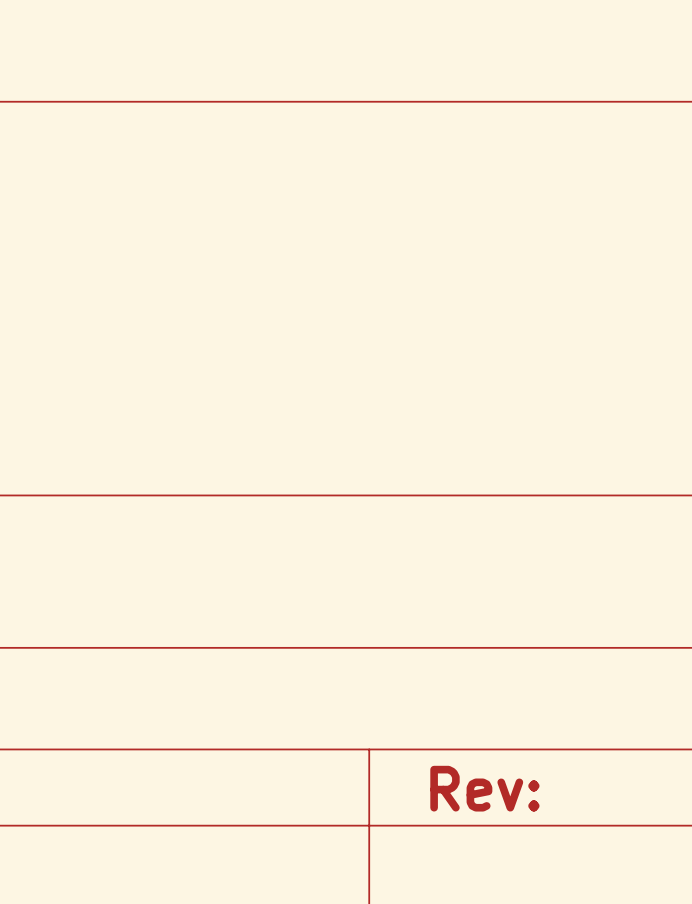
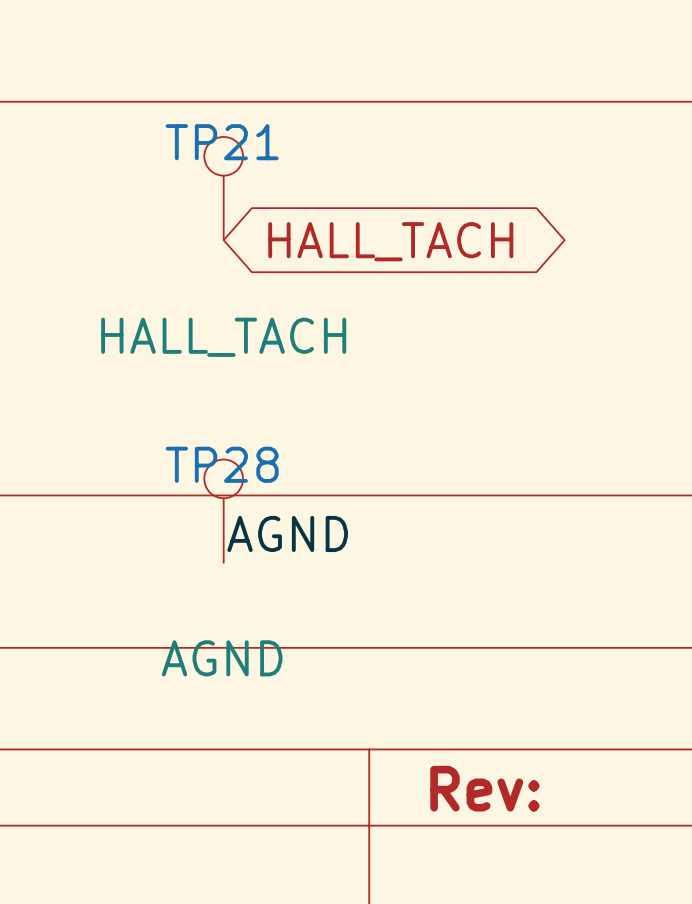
TP21: none -> HALL_TACH (223, 188)
global label: none -> HALL_TACH (390, 241)
TP28: none -> AGND (223, 511)
label: none -> AGND (287, 533)

